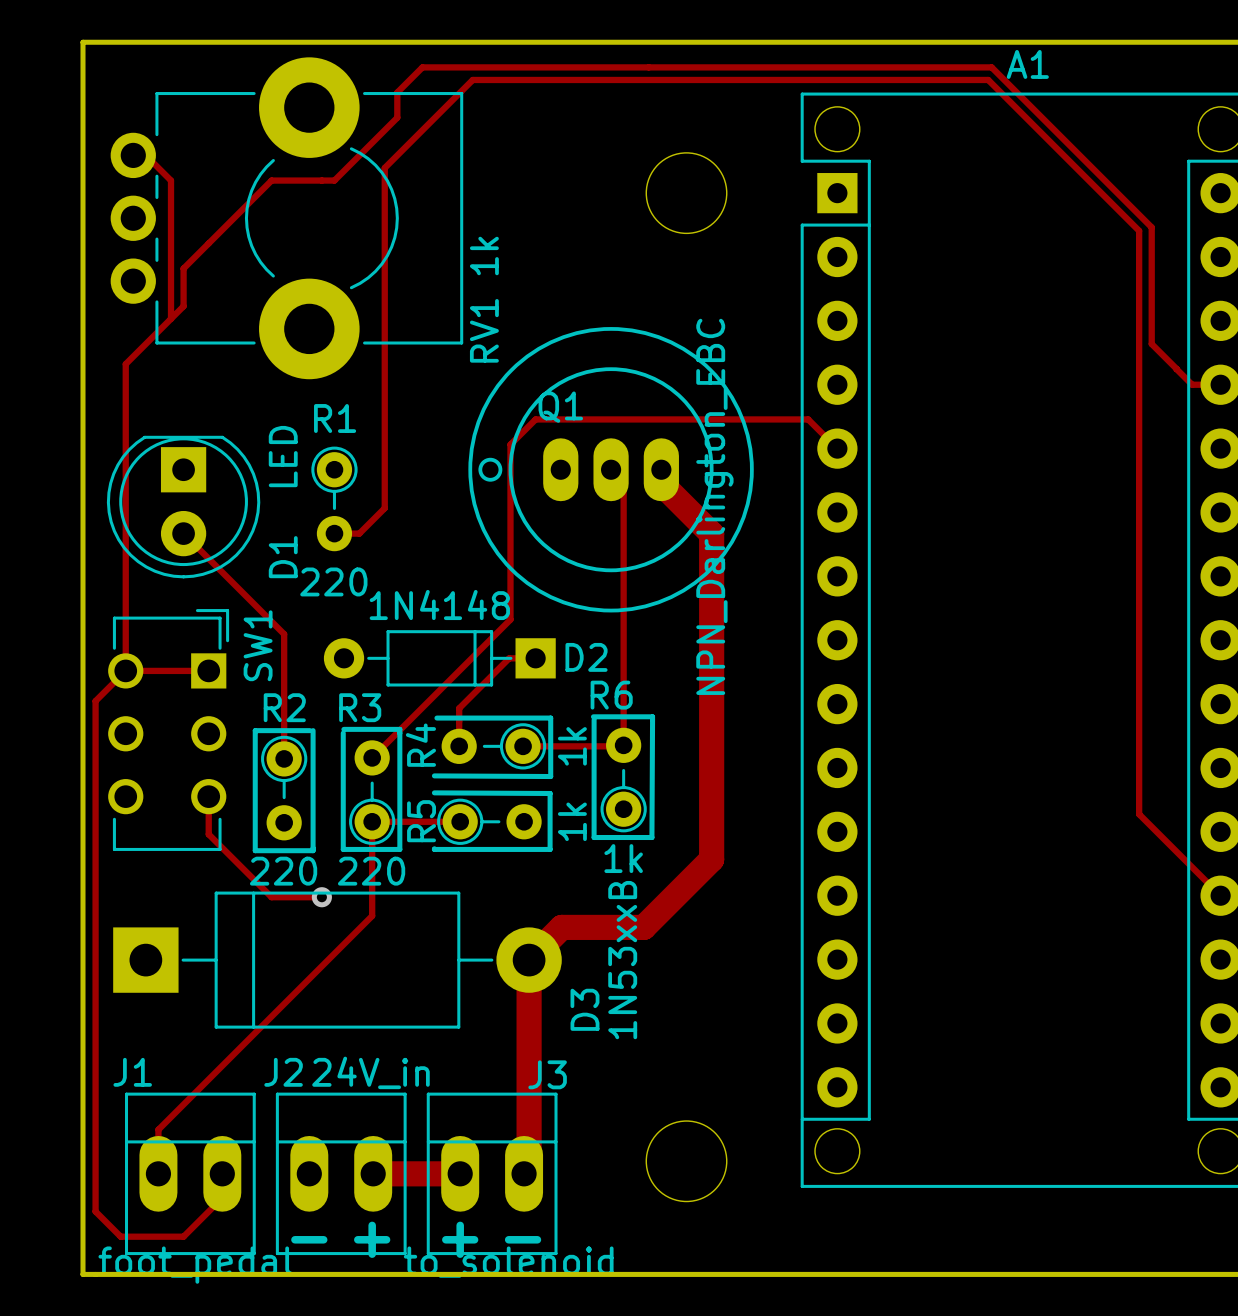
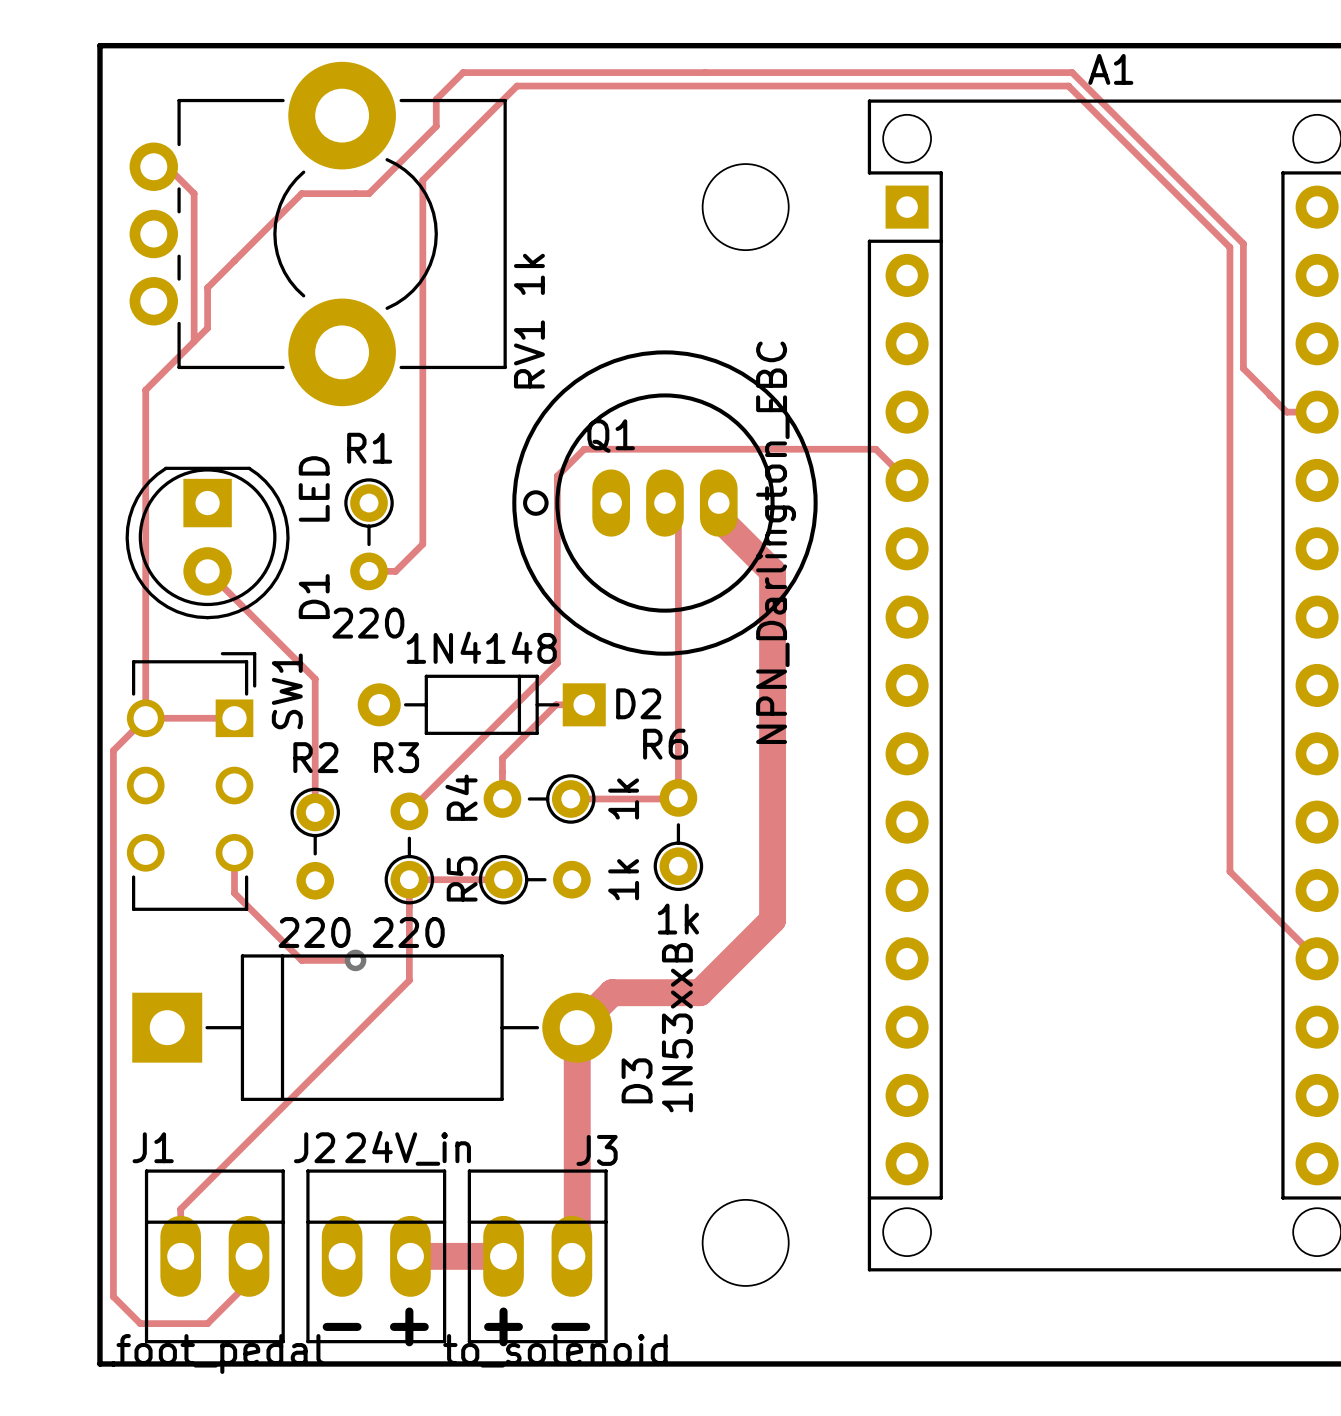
line: (593, 716) (652, 716) (651, 837) (594, 837) (594, 719) -> none
line: (436, 718) (550, 718) (550, 776) (434, 775) -> none
line: (343, 729) (399, 729) (399, 849) (343, 849) (343, 733) -> none
line: (309, 730) (255, 730) (255, 850) (313, 850) (313, 730) -> none
line: (434, 792) (550, 793) (550, 849) (434, 848) -> none

